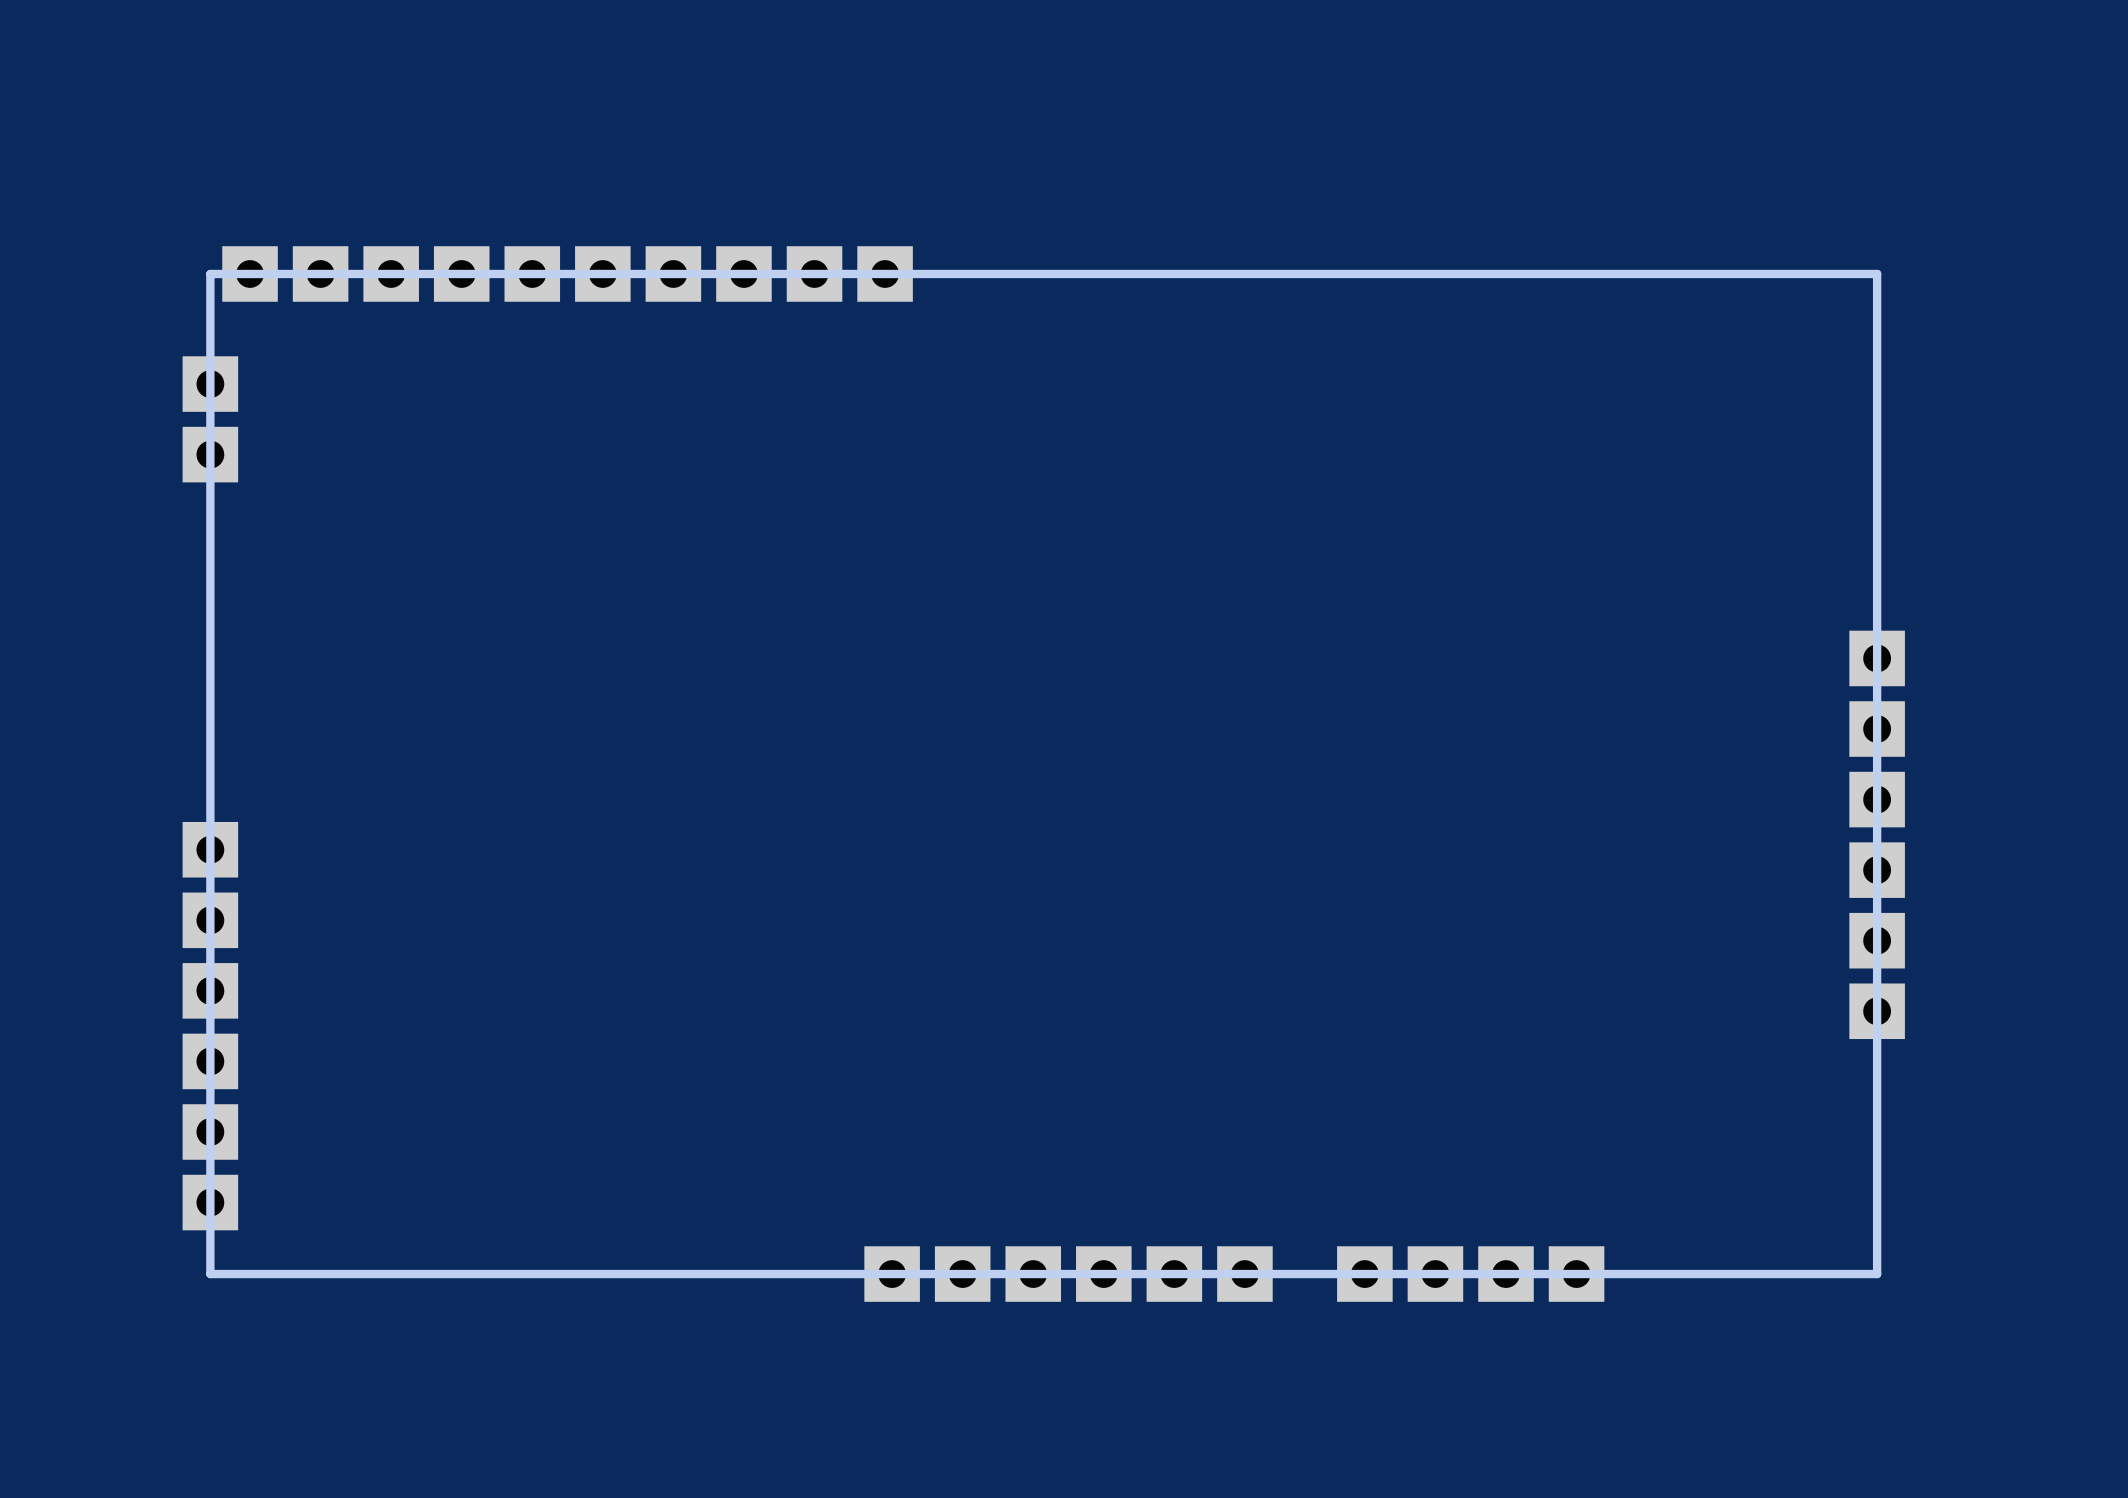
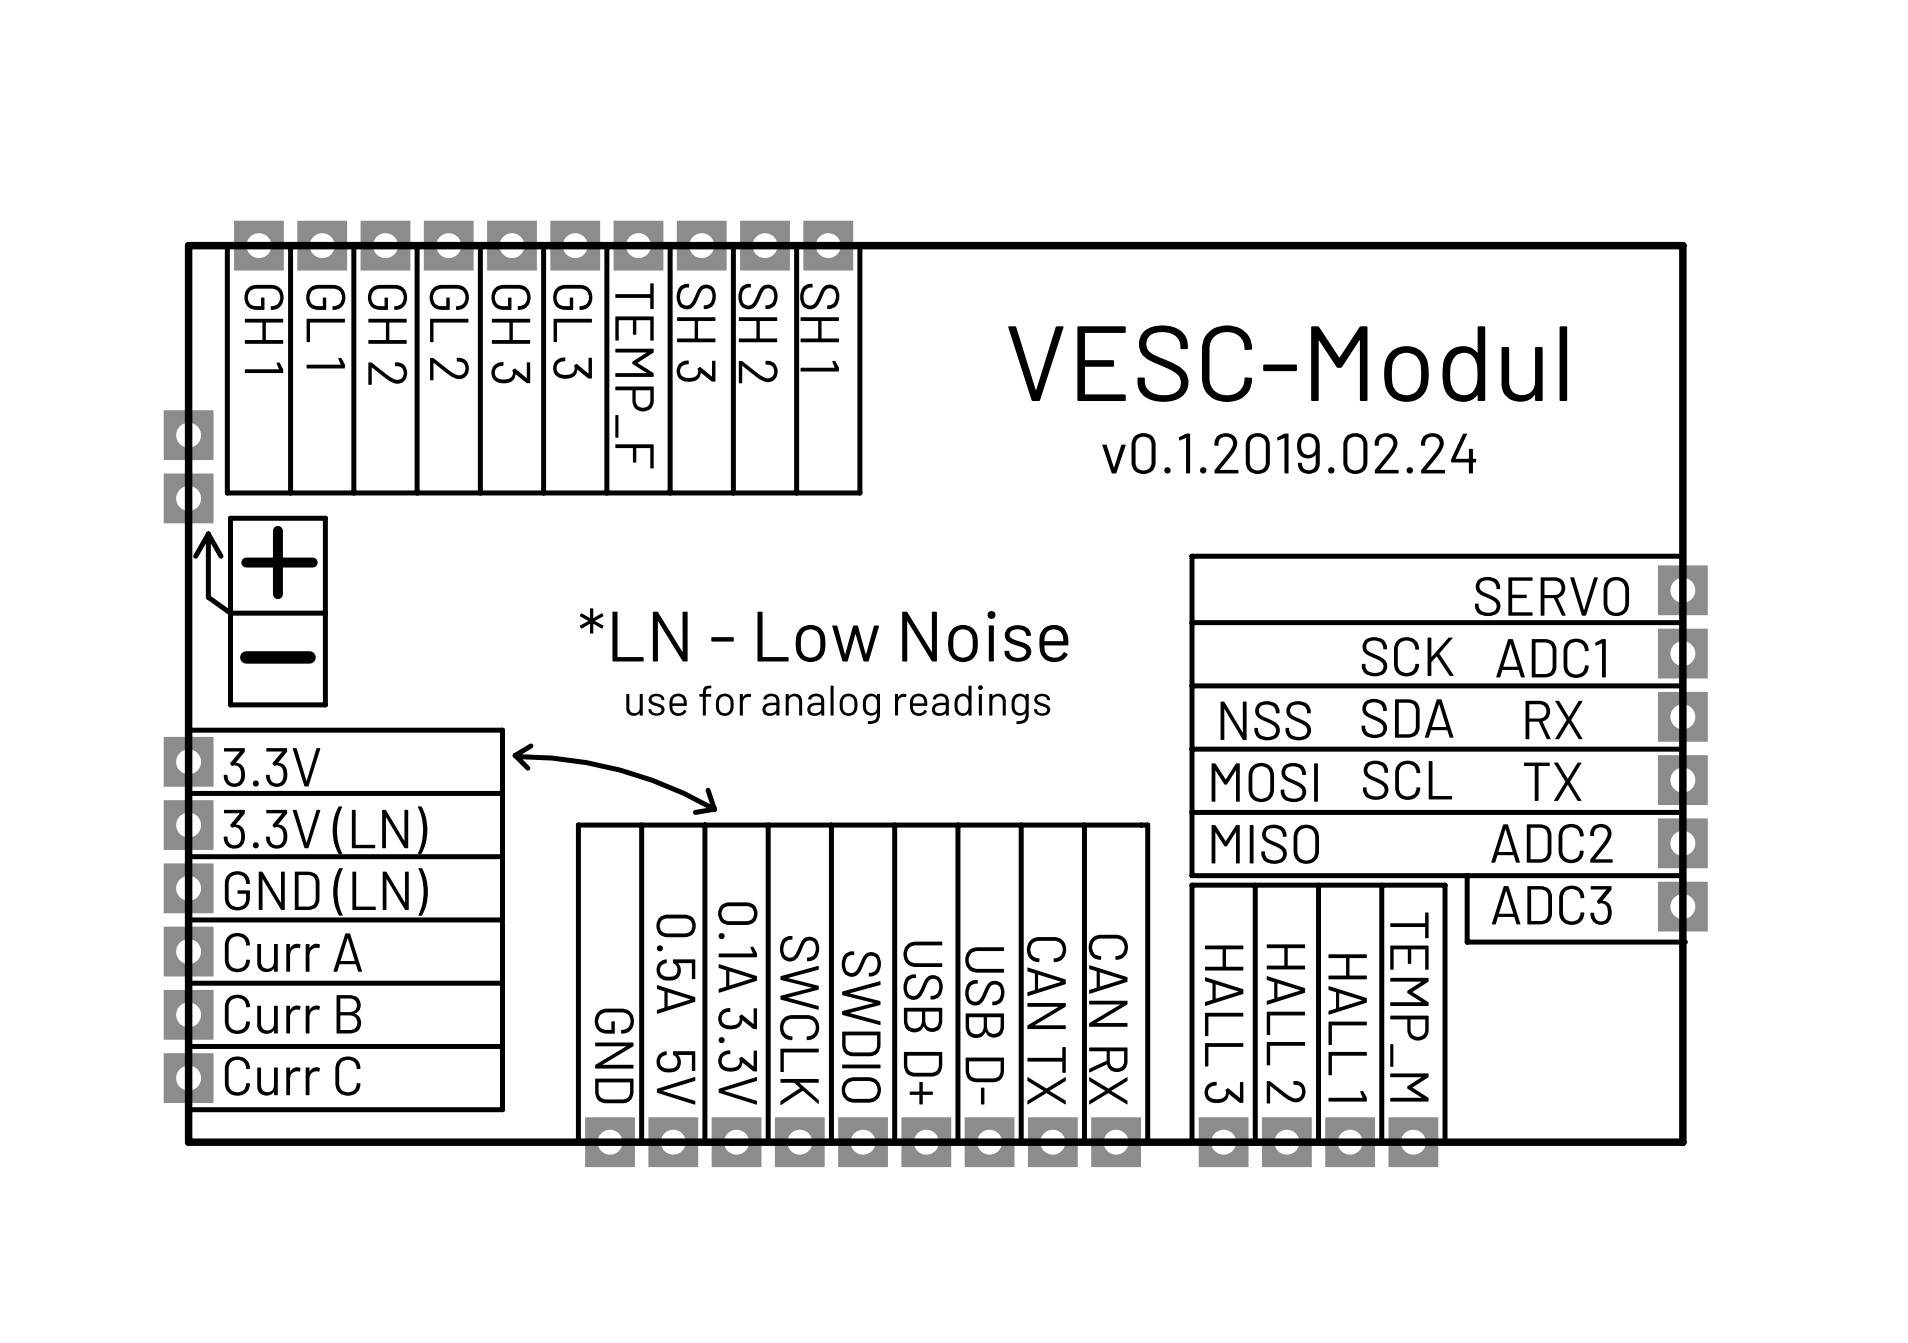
part position: (426, 273) -> (417, 245)
part position: (779, 273) -> (733, 245)
line: none -> (290, 246) (290, 492)
line: none -> (353, 246) (353, 492)
line: none -> (417, 246) (417, 492)
line: none -> (480, 246) (480, 492)
line: none -> (543, 246) (543, 492)
line: none -> (606, 246) (606, 492)
line: none -> (670, 246) (670, 492)
line: none -> (733, 246) (733, 492)
line: none -> (796, 246) (796, 492)
line: none -> (859, 246) (859, 492) (227, 492) (227, 246)
text: none -> GL 1 (325, 326)
text: none -> GL 2 (449, 332)
text: none -> GL 3 (572, 331)
text: none -> SH 3 (696, 332)
text: none -> SH 2 (758, 333)
text: none -> SH 1 (819, 327)
text: none -> GH 1 (264, 328)
text: none -> GH 2 (387, 334)
text: none -> GH 3 (511, 334)
text: none -> VESC-Modul (1287, 363)
part position: (210, 419) -> (188, 466)
text: none -> TEMP_F (634, 375)
text: none -> v0.1.2019.02.24 (1289, 453)
line: none -> (325, 518) (230, 518) (230, 704) (325, 704) (325, 518)
line: none -> (277, 530) (277, 594)
line: none -> (208, 534) (195, 556)
line: none -> (208, 534) (221, 556)
line: none -> (208, 534) (208, 597) (230, 613) (325, 613)
line: none -> (1682, 556) (1192, 556) (1192, 875) (1682, 875)
line: none -> (312, 562) (246, 562)
text: none -> SERVO (1552, 596)
line: none -> (1682, 622) (1192, 622)
text: none -> *LN - Low Noise (824, 635)
text: none -> SCK (1407, 656)
line: none -> (309, 657) (246, 657)
text: none -> ADC1 (1550, 658)
line: none -> (1682, 685) (1192, 685)
text: none -> use for analog readings (838, 704)
text: none -> SDA (1407, 718)
text: none -> NSS (1265, 720)
text: none -> RX (1554, 720)
line: none -> (189, 730) (502, 730) (502, 919) (189, 919)
line: none -> (530, 745) (515, 755) (527, 768)
line: none -> (1682, 749) (1192, 749)
line: none -> (517, 756) (552, 758) (619, 769) (683, 793) (714, 809)
text: none -> 3.3V (272, 767)
text: none -> SCL (1407, 780)
text: none -> MOSI (1264, 782)
text: none -> TX (1552, 781)
line: none -> (708, 790) (714, 809)
line: none -> (502, 793) (189, 793)
line: none -> (714, 809) (695, 812)
line: none -> (1682, 812) (1192, 812)
line: none -> (641, 825) (641, 1141)
line: none -> (704, 825) (704, 1141)
line: none -> (768, 825) (768, 1141)
line: none -> (831, 825) (831, 1141)
line: none -> (894, 825) (894, 1141)
line: none -> (957, 825) (957, 1141)
line: none -> (1021, 825) (1021, 1141)
line: none -> (1084, 825) (1084, 1141)
text: none -> 3.3V (LN) (325, 830)
text: none -> ADC2 (1551, 843)
text: none -> MISO (1265, 844)
line: none -> (502, 856) (189, 856)
line: none -> (1467, 875) (1467, 942) (1685, 942)
line: none -> (1255, 885) (1255, 1141)
line: none -> (1318, 885) (1318, 1141)
line: none -> (1381, 885) (1381, 1141)
text: none -> GND (LN) (326, 891)
text: none -> ADC3 (1551, 905)
line: none -> (502, 923) (502, 1109) (189, 1109)
text: none -> Curr A (293, 952)
text: none -> 0.5A 5V (676, 1009)
text: none -> 0.1A 3.3V (737, 1003)
line: none -> (502, 983) (189, 983)
text: none -> USB D+ (923, 1023)
text: none -> USB D- (984, 1025)
text: none -> TEMP_M (1409, 1007)
text: none -> CAN RX (1108, 1019)
text: none -> CAN TX (1046, 1020)
text: none -> HALL 3 (1223, 1024)
text: none -> HALL 2 (1286, 1023)
text: none -> HALL 1 (1347, 1027)
text: none -> SWCLK (799, 1020)
text: none -> Curr B (292, 1014)
text: none -> SWDIO (861, 1026)
text: none -> GND (614, 1055)
line: none -> (502, 1046) (189, 1046)
text: none -> Curr C (292, 1076)
line: none -> (1147, 1141) (1147, 825) (578, 825) (578, 1141)
line: none -> (1445, 1141) (1445, 885) (1192, 885) (1192, 1141)
part: none -> (863, 1142)

